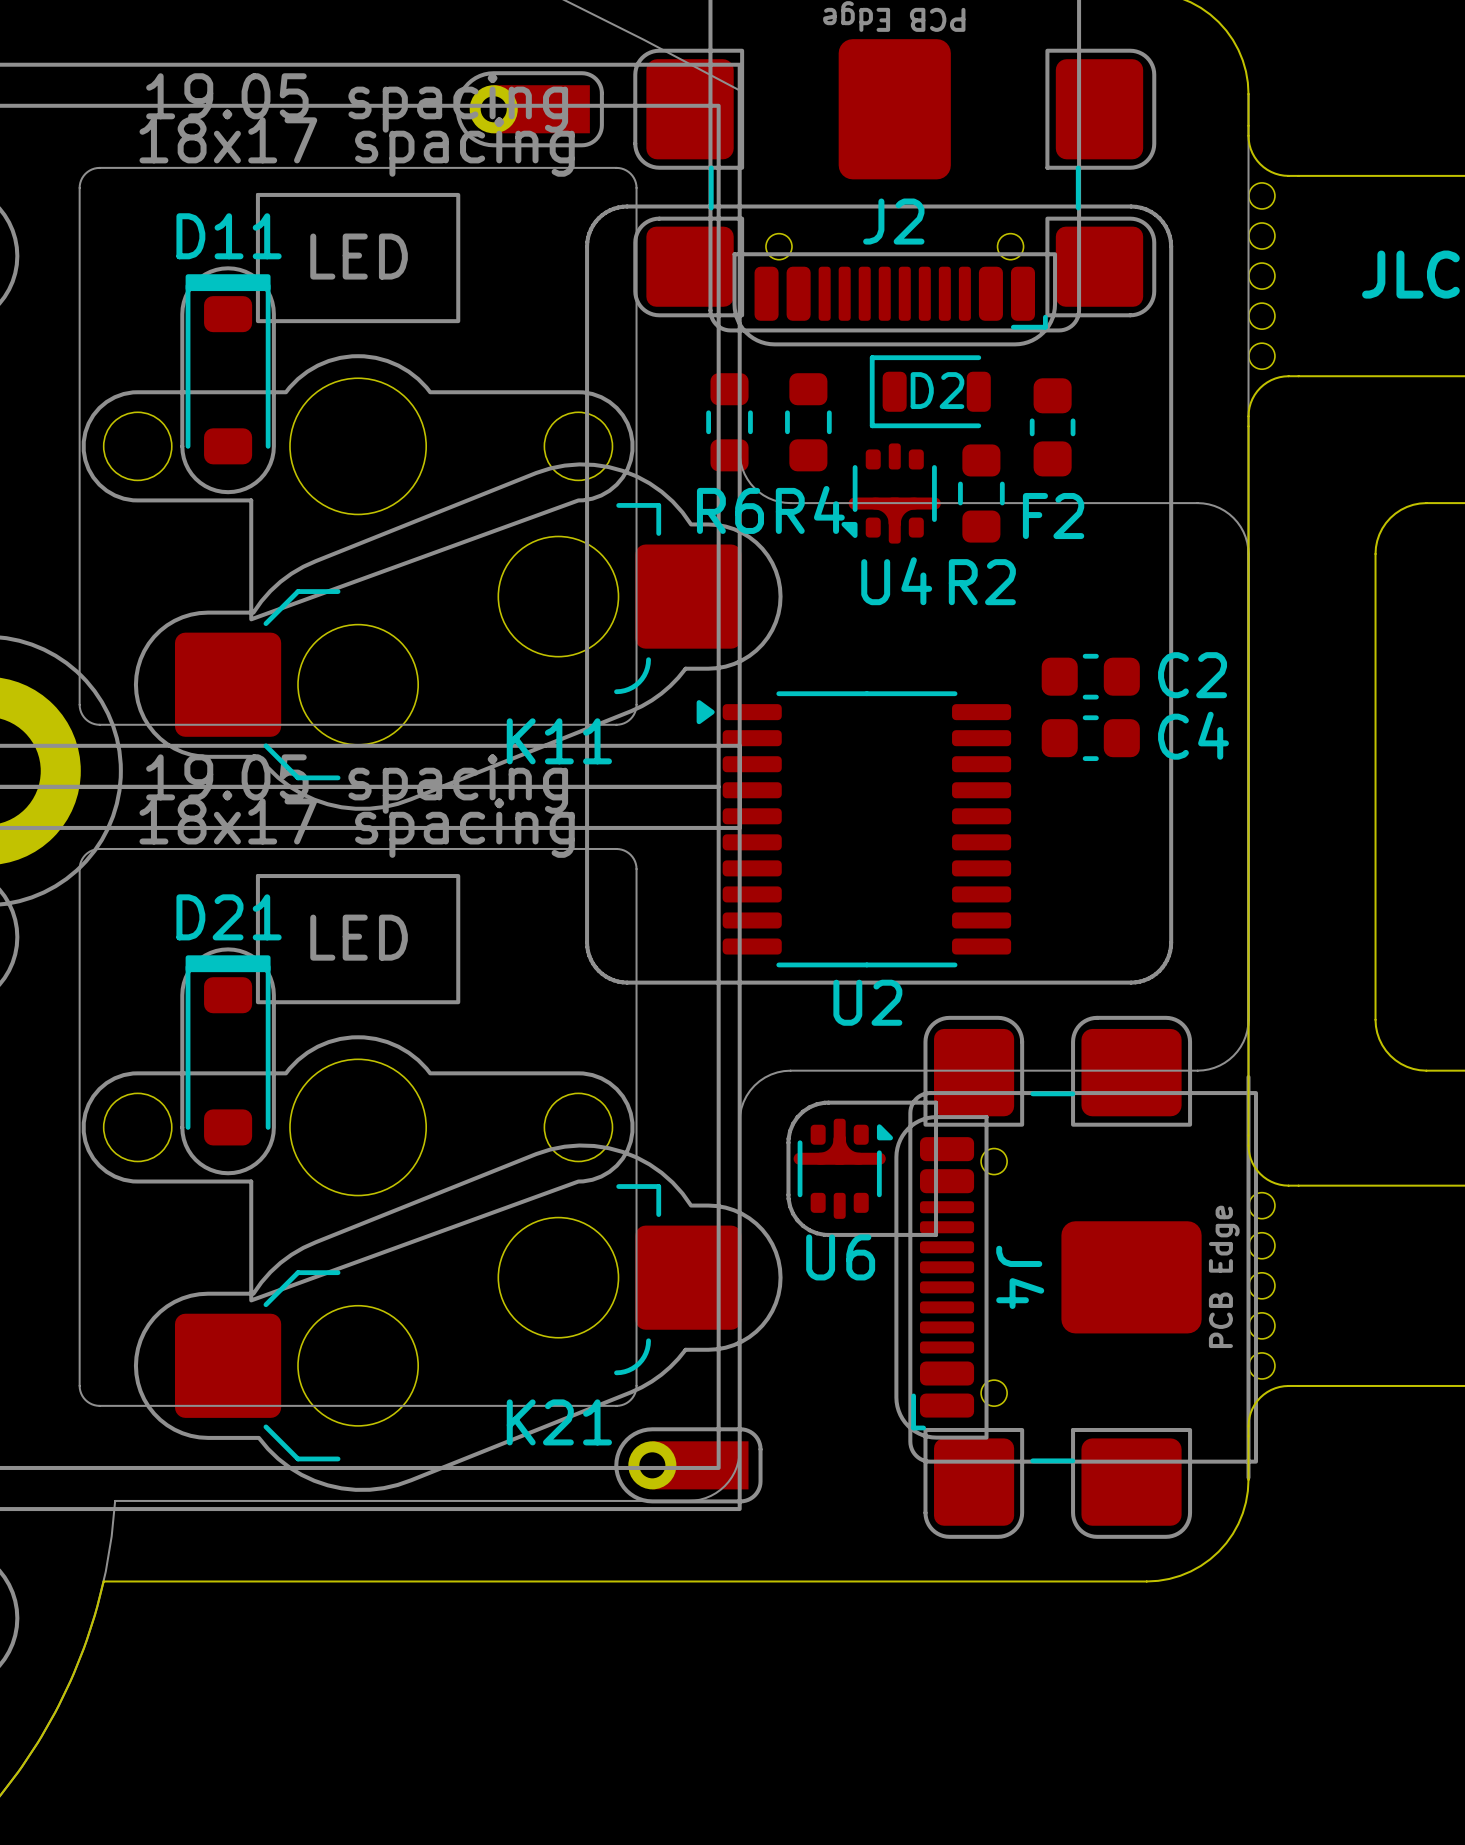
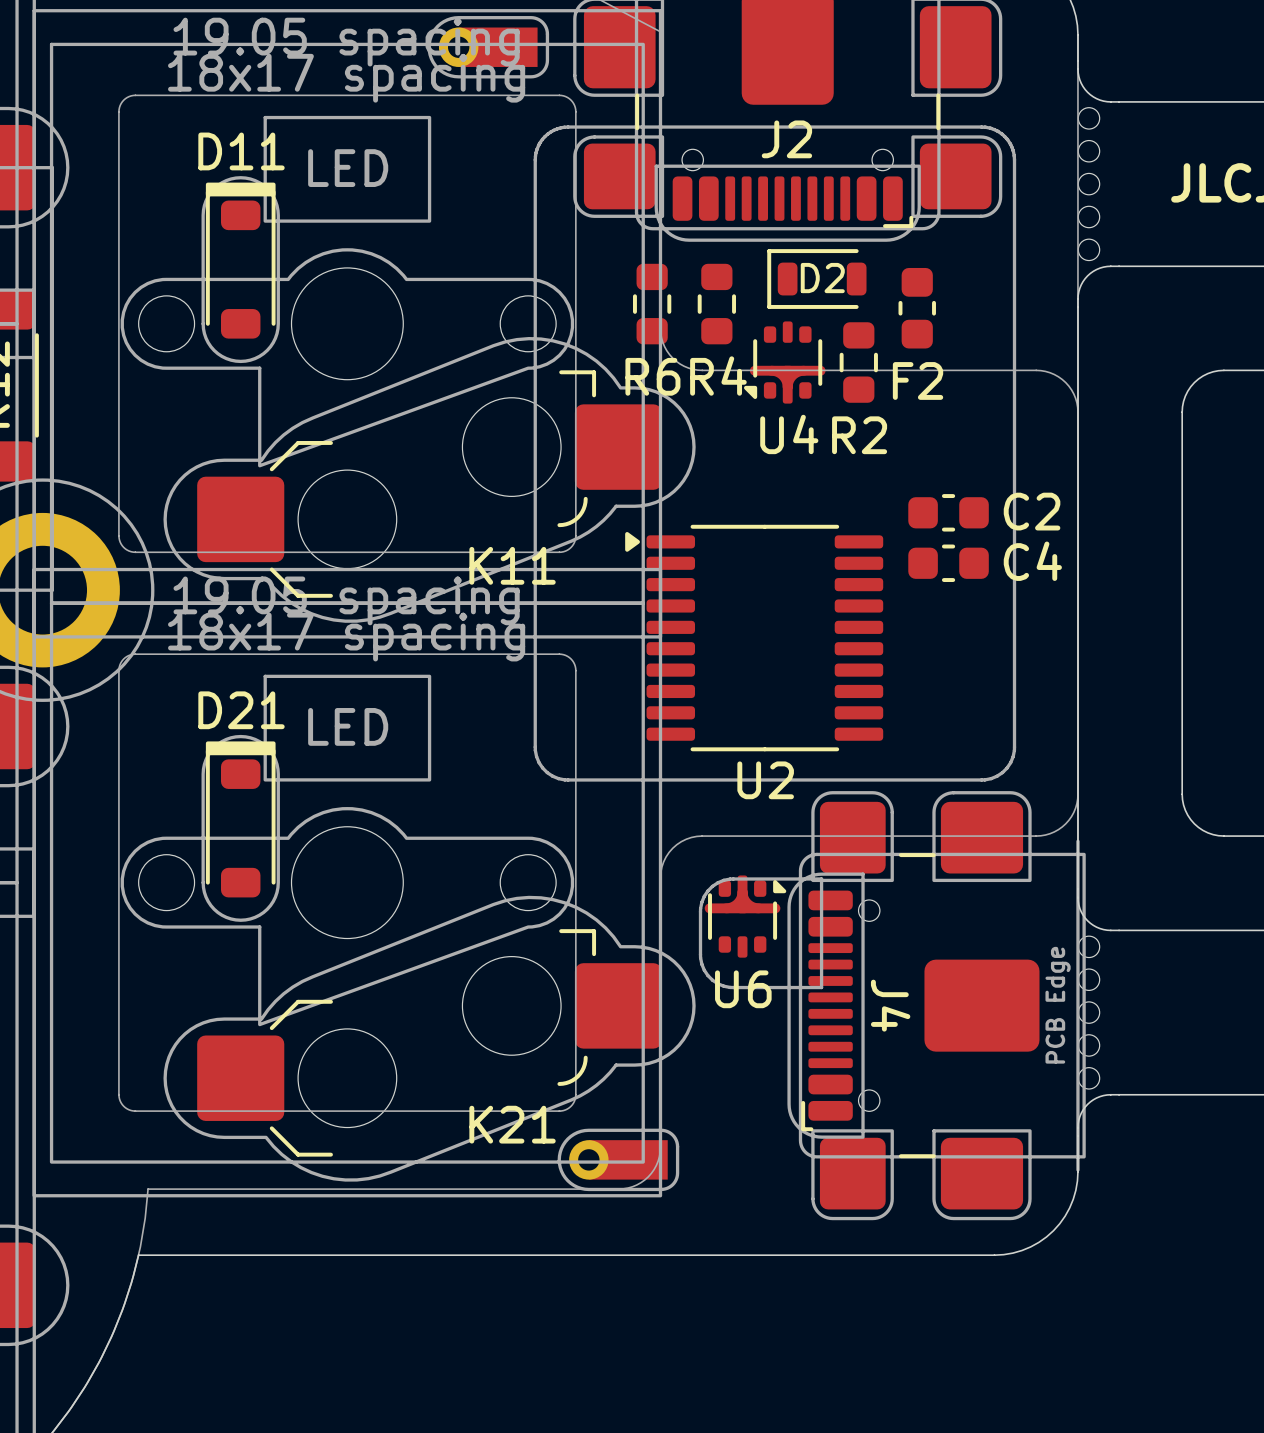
line: (587, 942) (591, 959) (598, 970) (609, 978) (627, 982) (1135, 982) (1148, 978) (1162, 967) (1168, 955) (1171, 942) -> (535, 730) (536, 756) (542, 768) (552, 776) (568, 779) (984, 779) (1002, 772) (1010, 762) (1014, 750) (1014, 730)
line: (936, 1122) (936, 1102) (816, 1104) (803, 1111) (793, 1123) (788, 1138) (788, 1163) -> (821, 878) (723, 880) (707, 890) (701, 902) (700, 911)
line: (788, 1194) (790, 1206) (797, 1220) (803, 1225) (816, 1233) (936, 1234) -> (700, 937) (700, 957) (704, 970) (712, 980) (723, 986) (821, 987) (821, 970)

